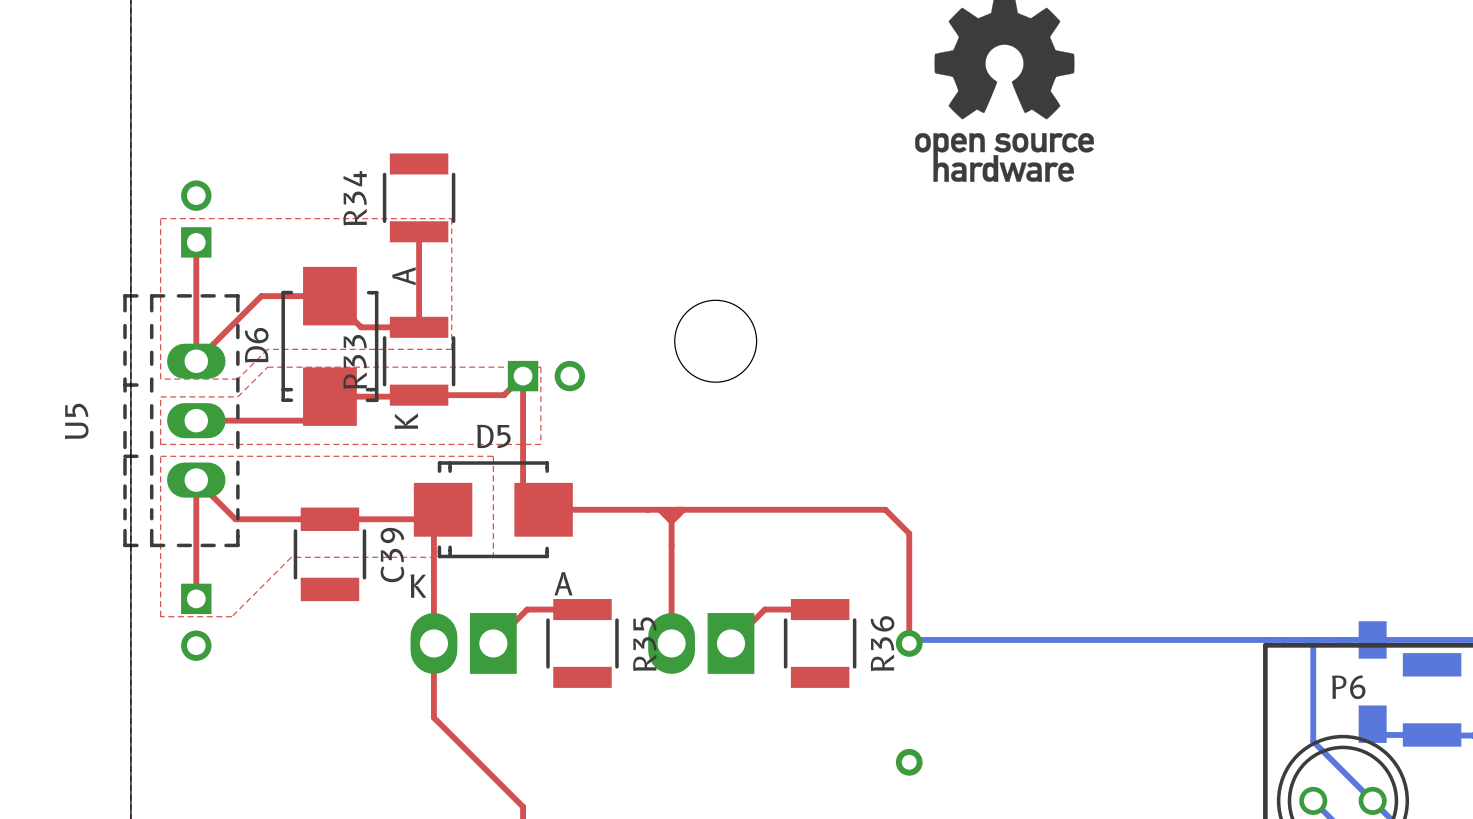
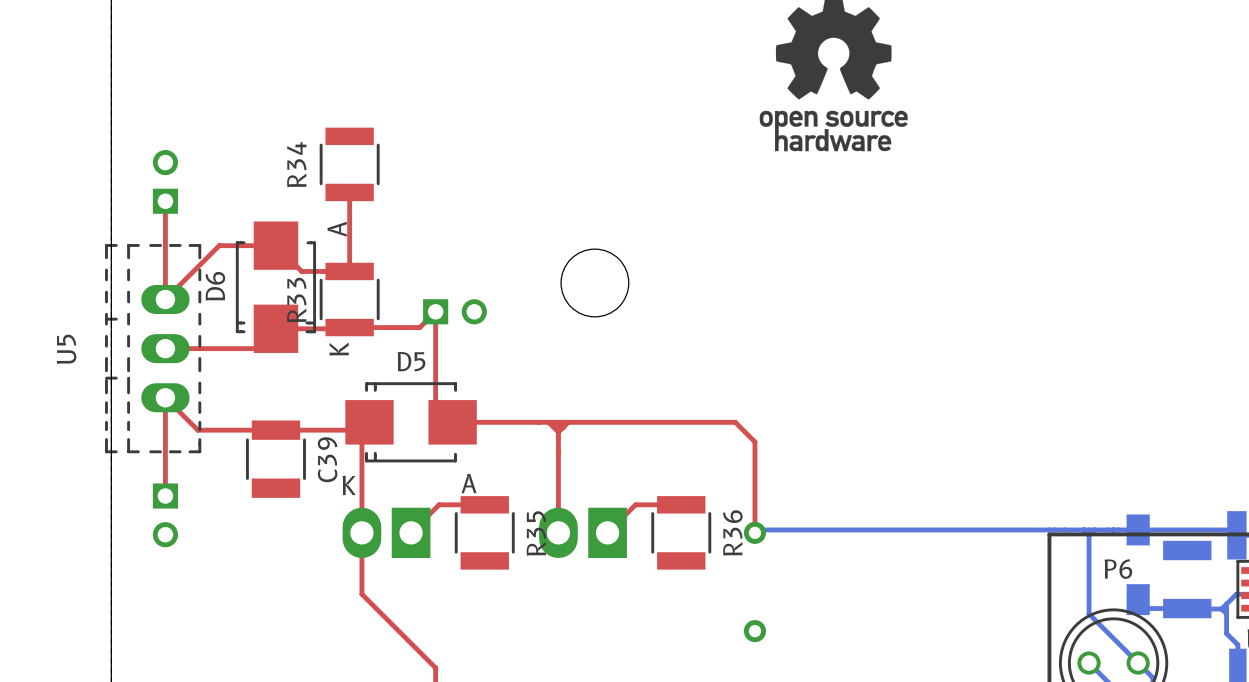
top zone outline: (160, 218) (160, 379) (237, 379) (267, 349) (451, 349) (451, 218) (160, 218) -> none
top zone outline: (267, 367) (237, 396) (160, 396) (160, 444) (540, 444) (540, 367) (267, 367) -> none
top zone outline: (160, 456) (160, 616) (231, 616) (291, 557) (493, 557) (493, 456) (160, 456) -> none

